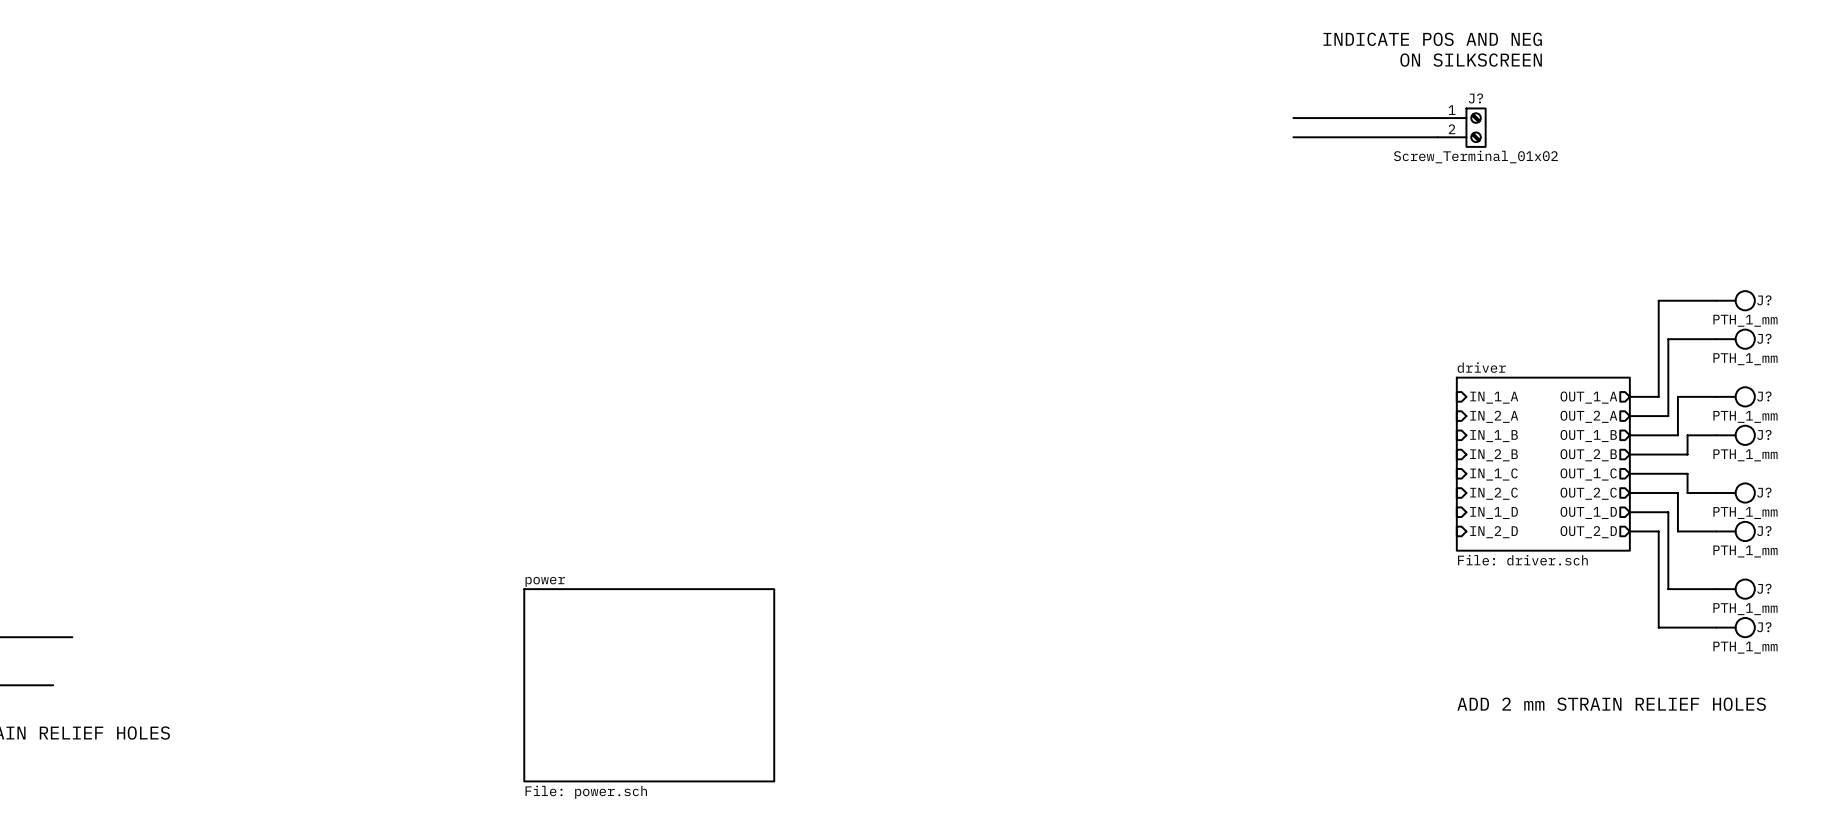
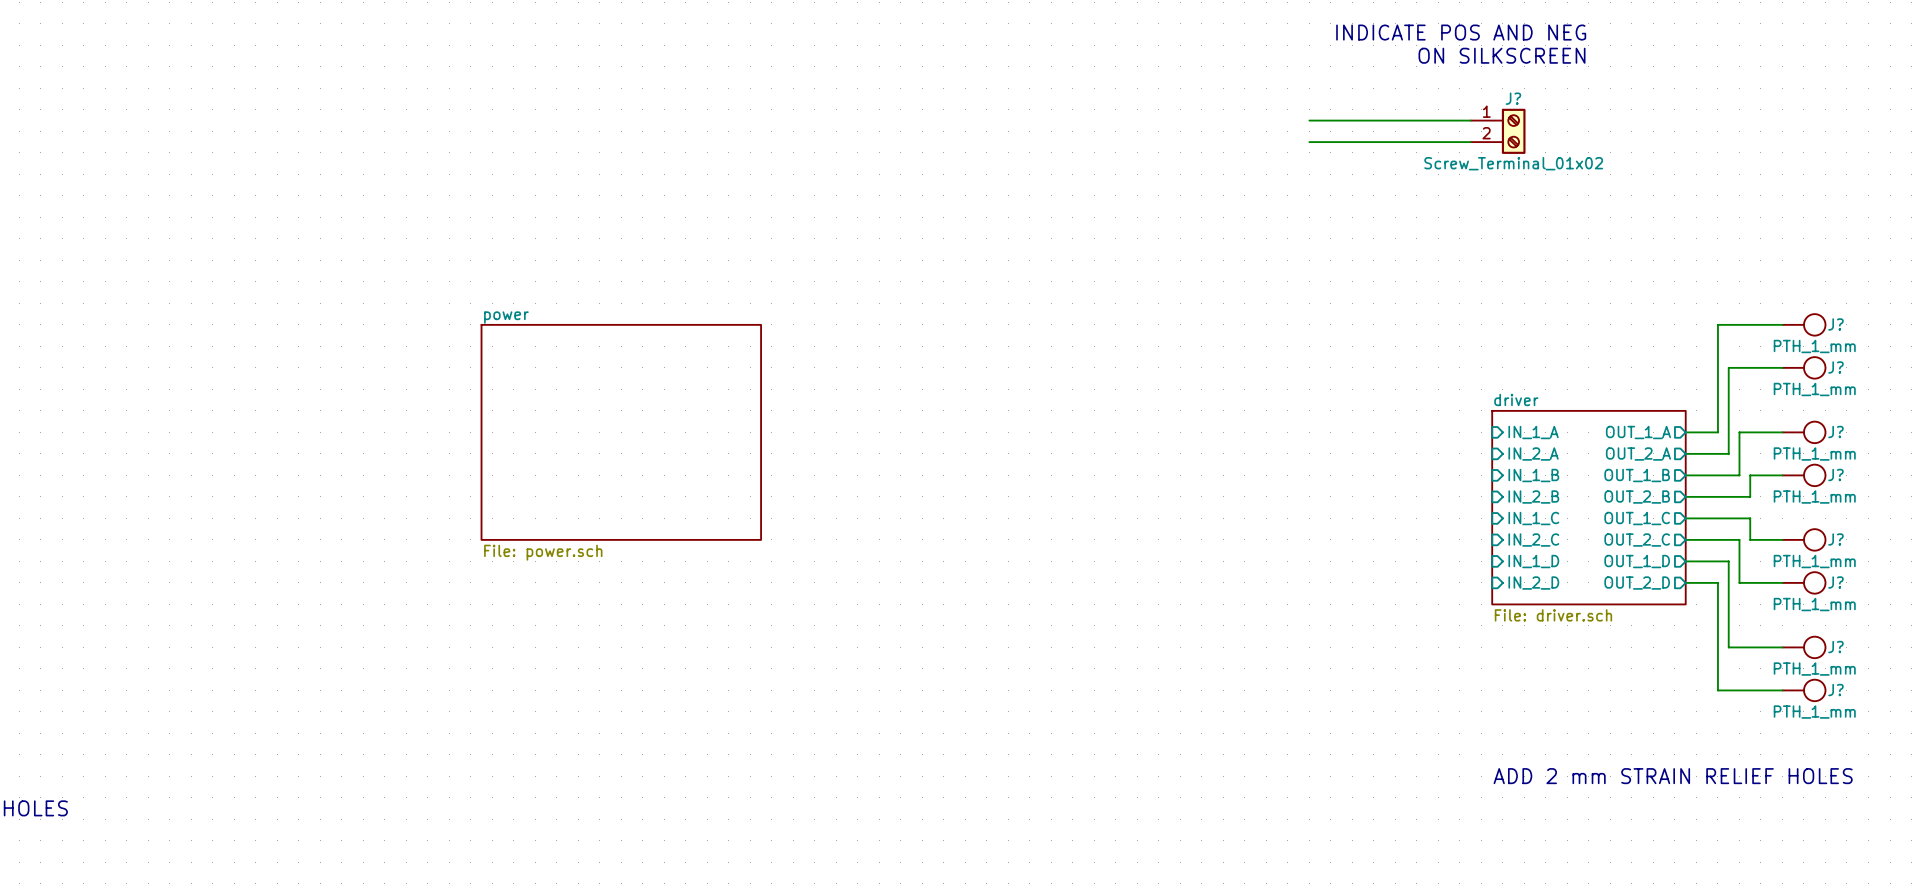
sheet power: none -> File: power.sch (621, 432)
sheet power: File: power.sch (649, 685) -> none

